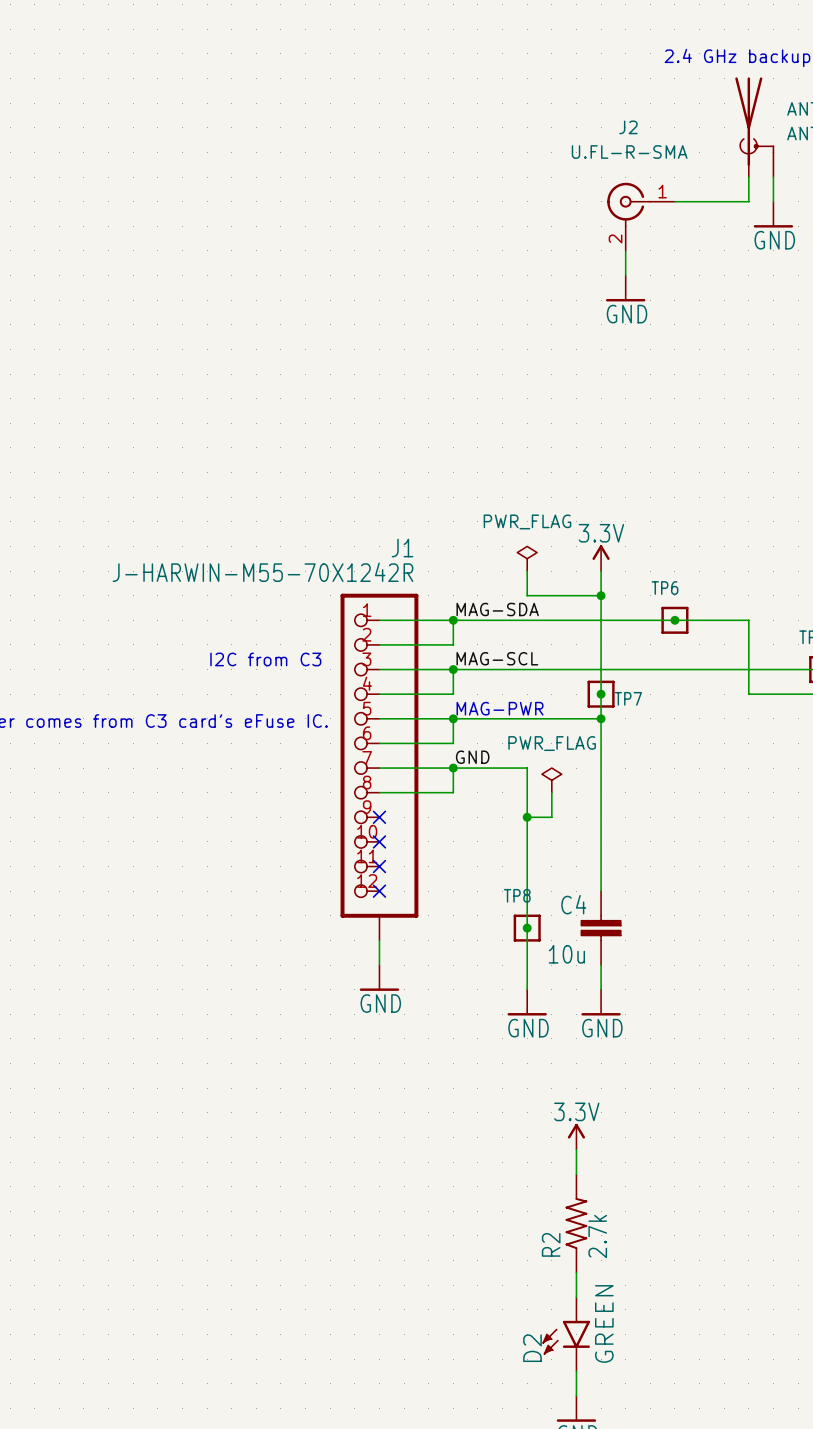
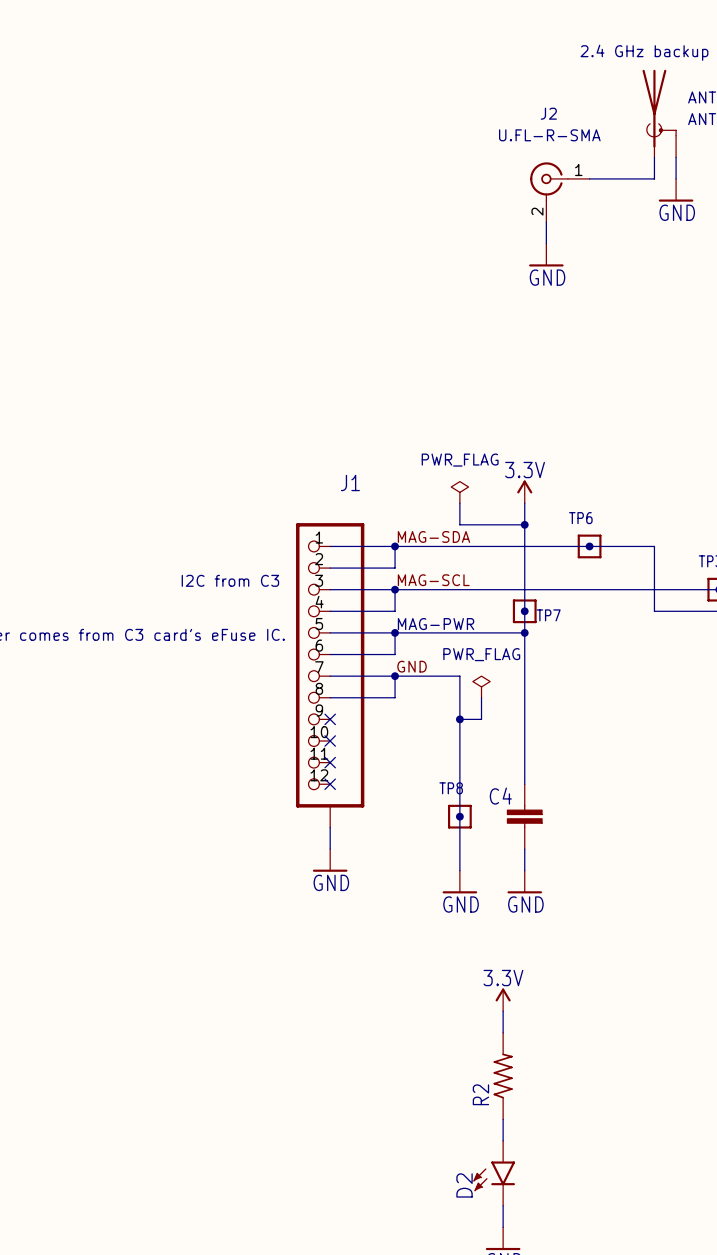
J1 value: J-HARWIN-M55-70X1242R (262, 572) -> none
C4 value: 10u (566, 954) -> none
R2 value: 2.7k (597, 1236) -> none
D2 value: GREEN (604, 1323) -> none

